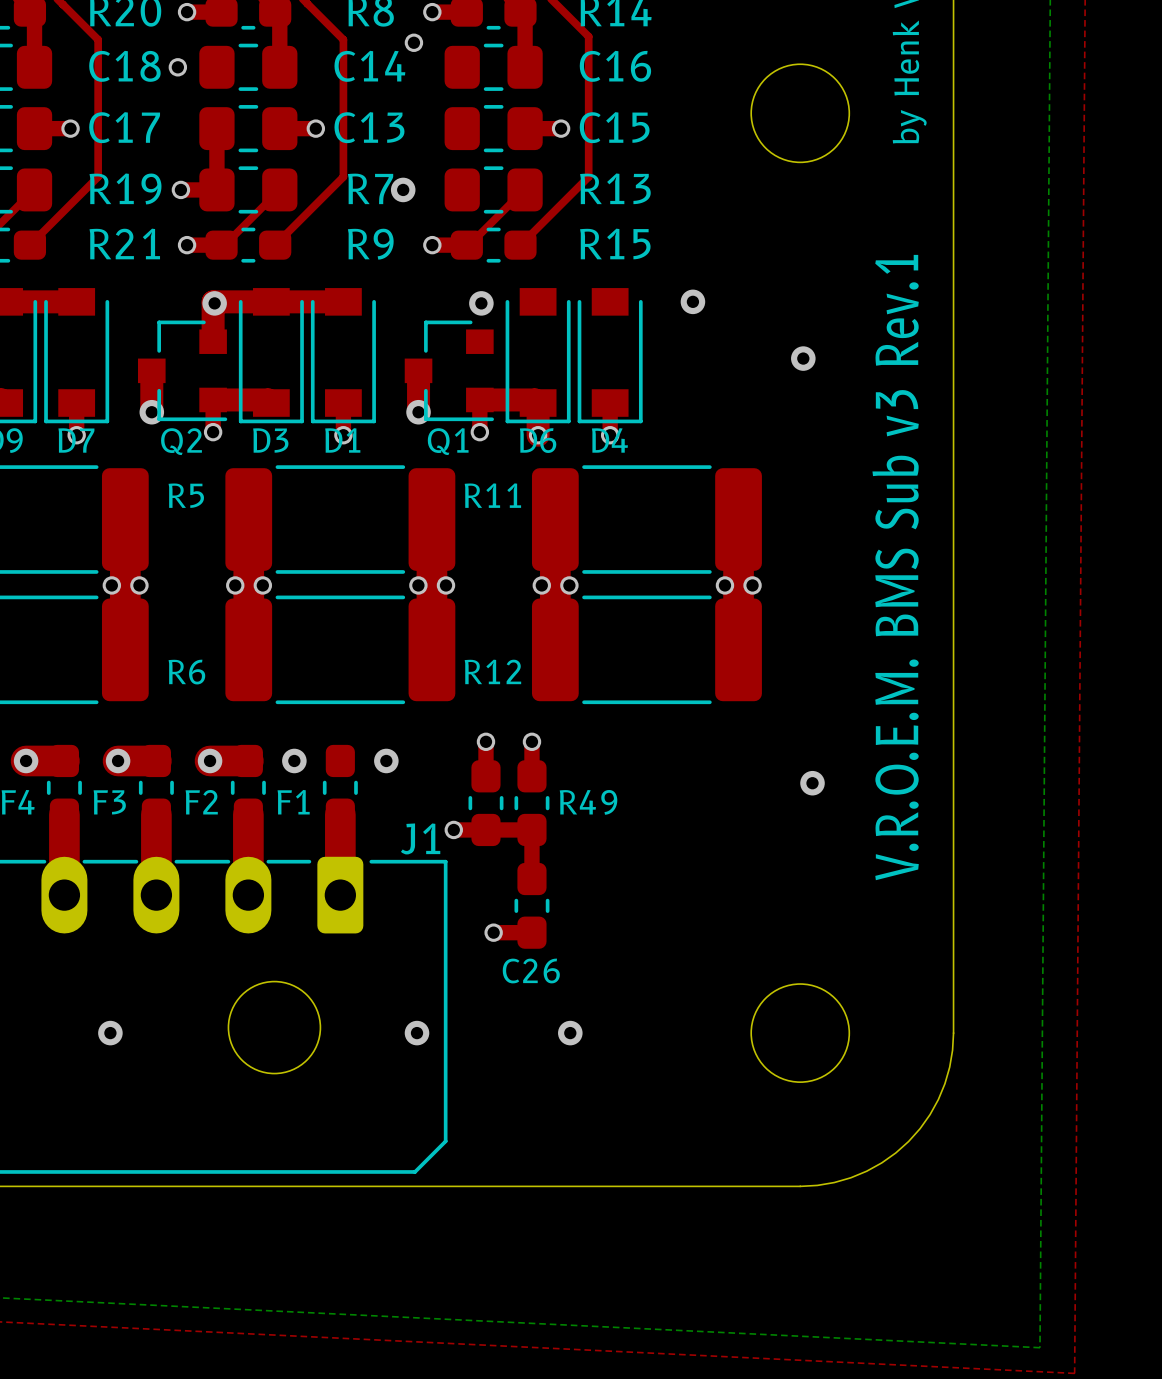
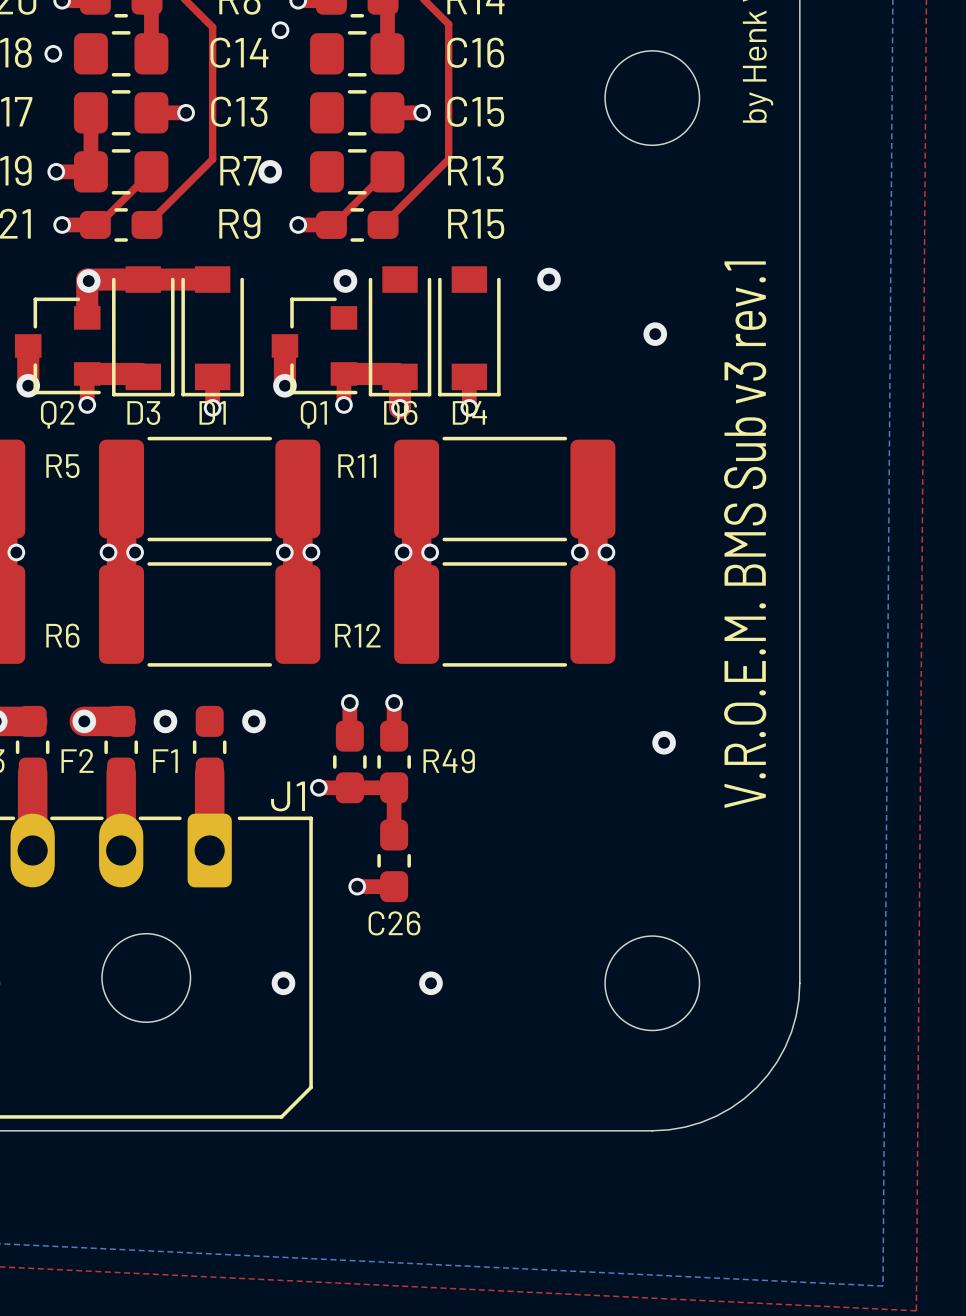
text: V.R.O.E.M. BMS Sub v3 Rev.1 (895, 567) -> V.R.O.E.M. BMS Sub v3 rev.1 (745, 534)

